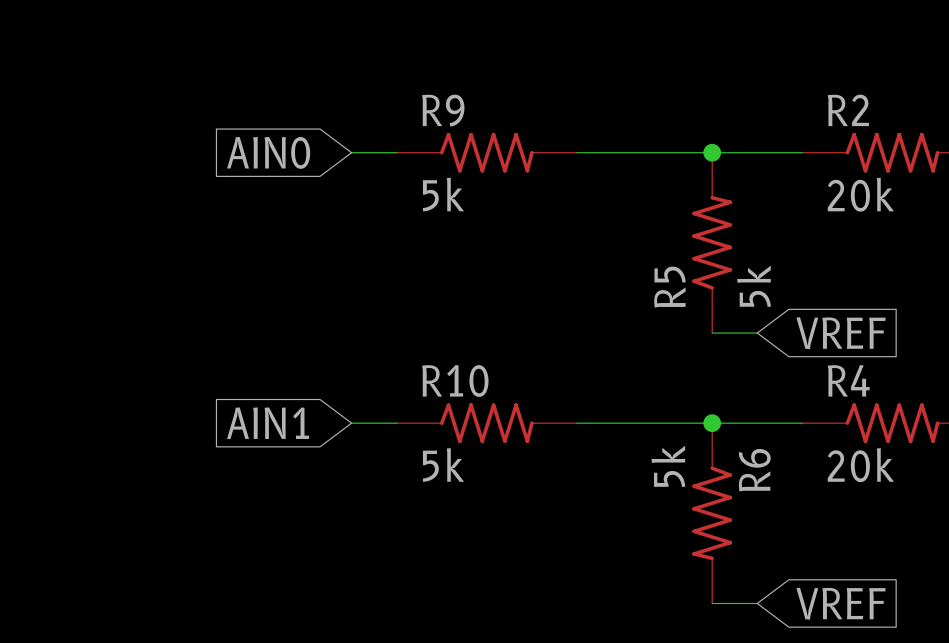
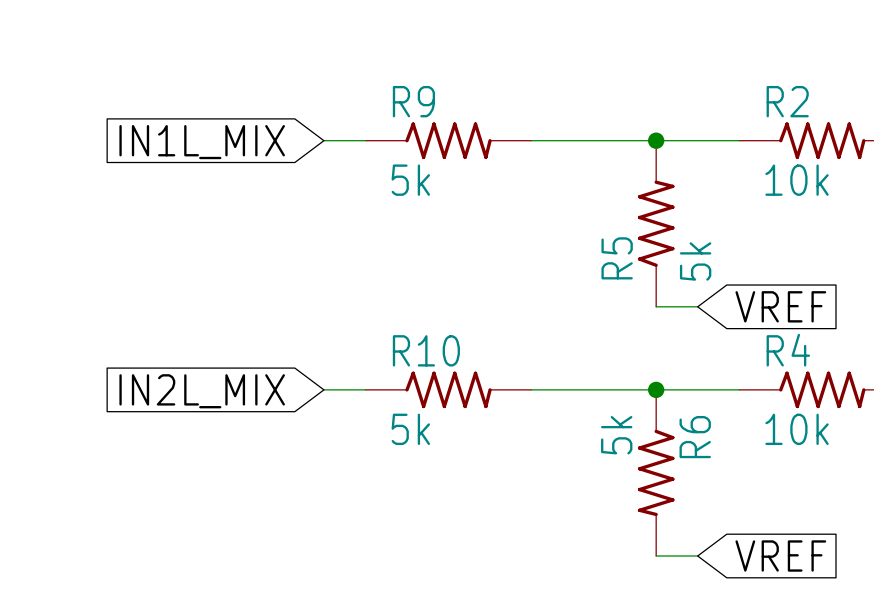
global label: AIN0 (268, 152) -> IN1L_MIX (202, 142)
R2 value: 20k (860, 194) -> 10k (797, 180)
global label: AIN1 (268, 423) -> IN2L_MIX (202, 391)
R4 value: 20k (860, 465) -> 10k (797, 429)

